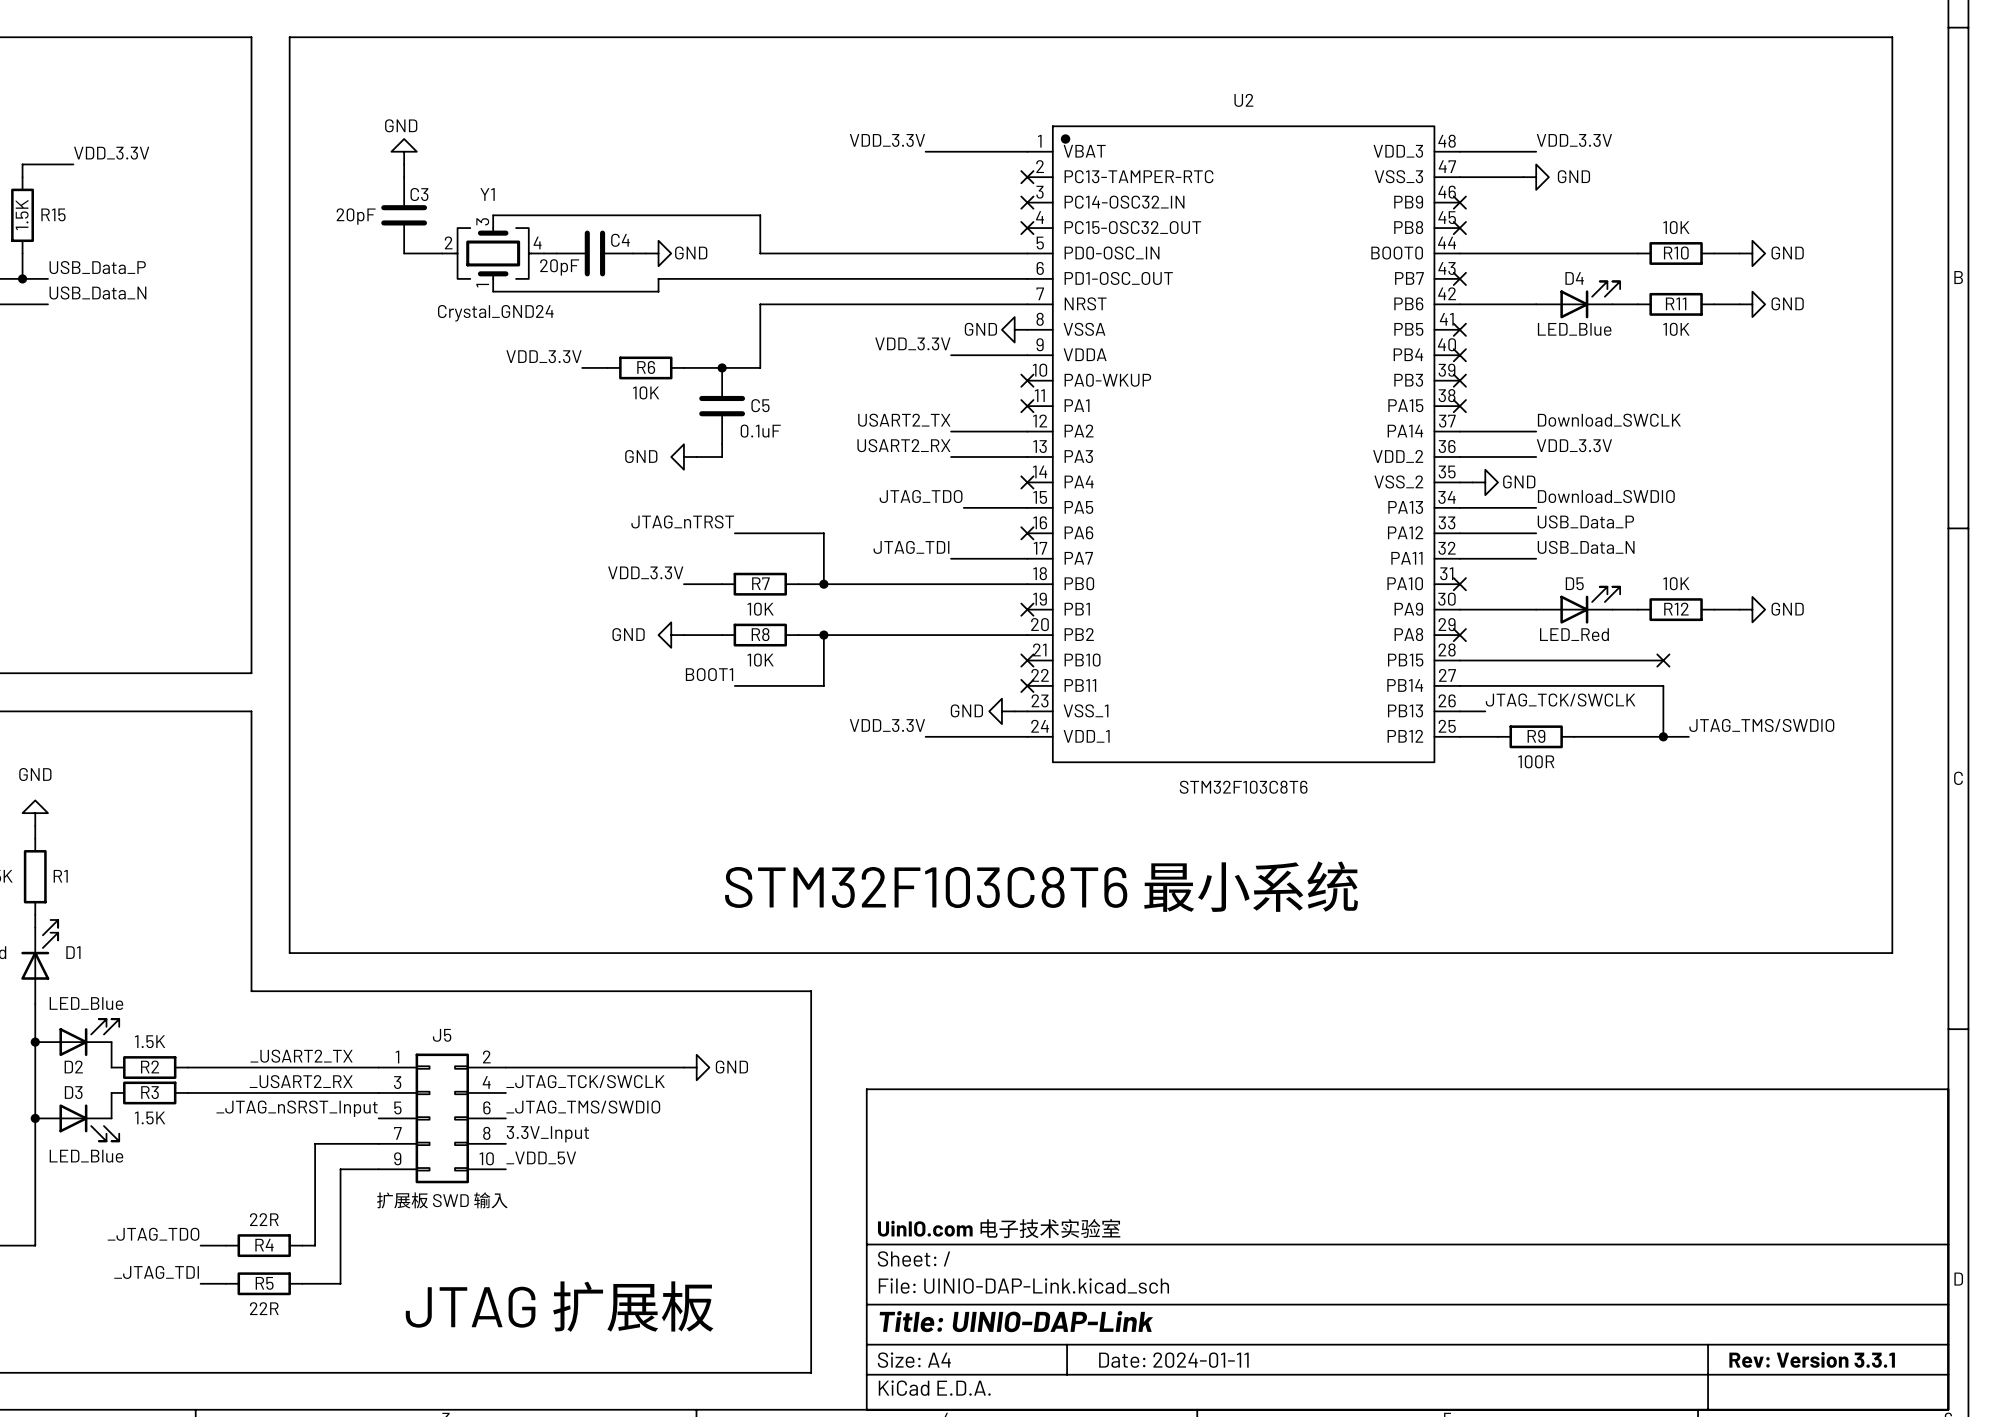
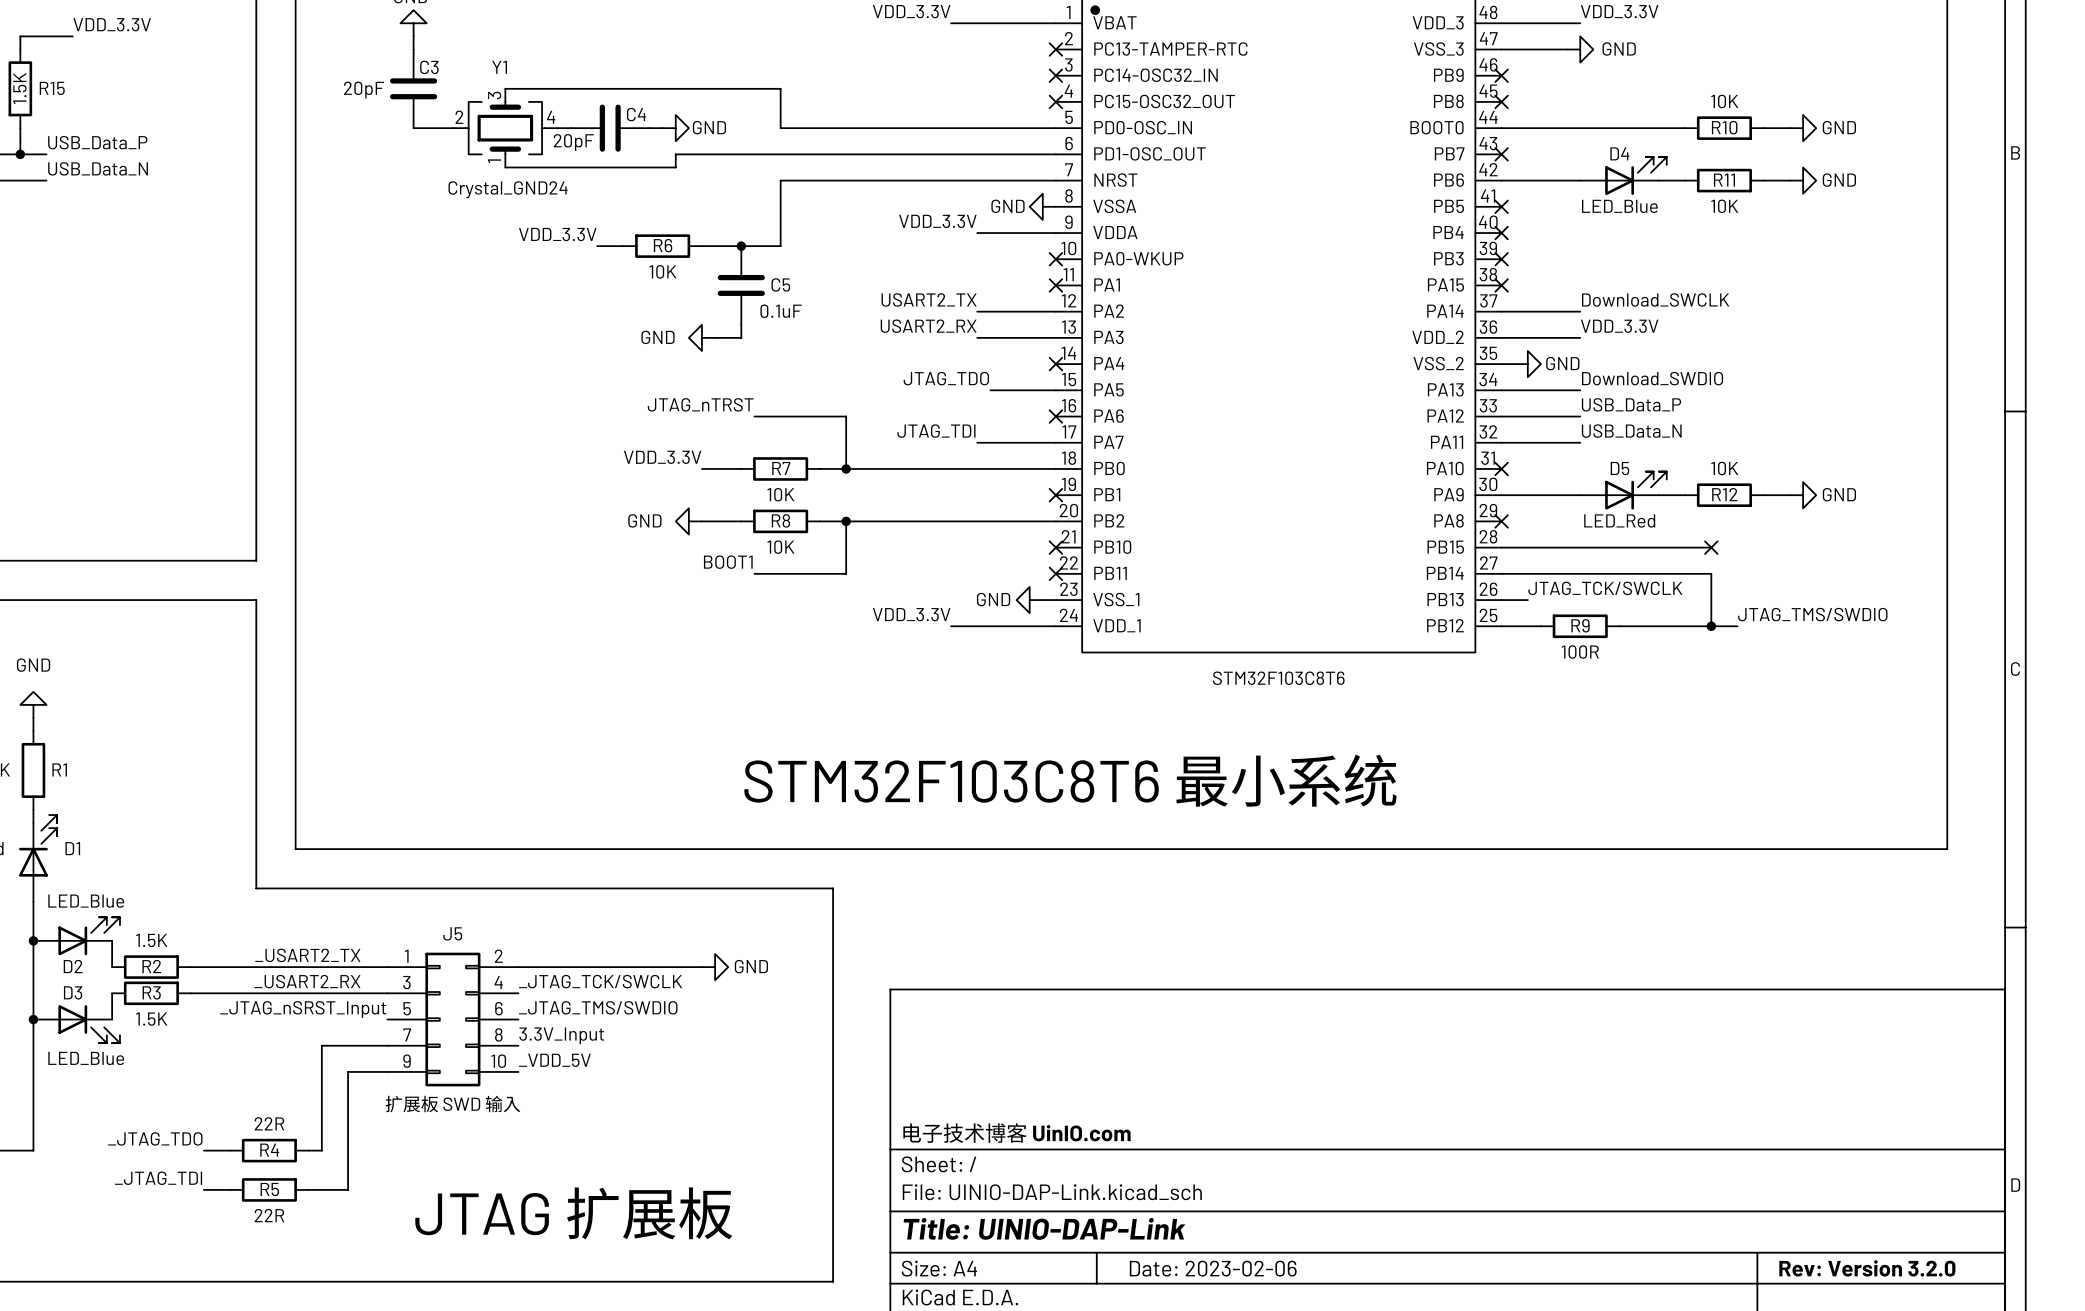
title block: UinIO.com 电子技术实验室 (999, 1228) -> 电子技术博客 UinIO.com (1016, 1133)
title block: Rev: Version 3.3.1 (1812, 1359) -> Rev: Version 3.2.0 (1867, 1268)
title block: Date: 2024-01-11 (1173, 1360) -> Date: 2023-02-06 (1213, 1268)

